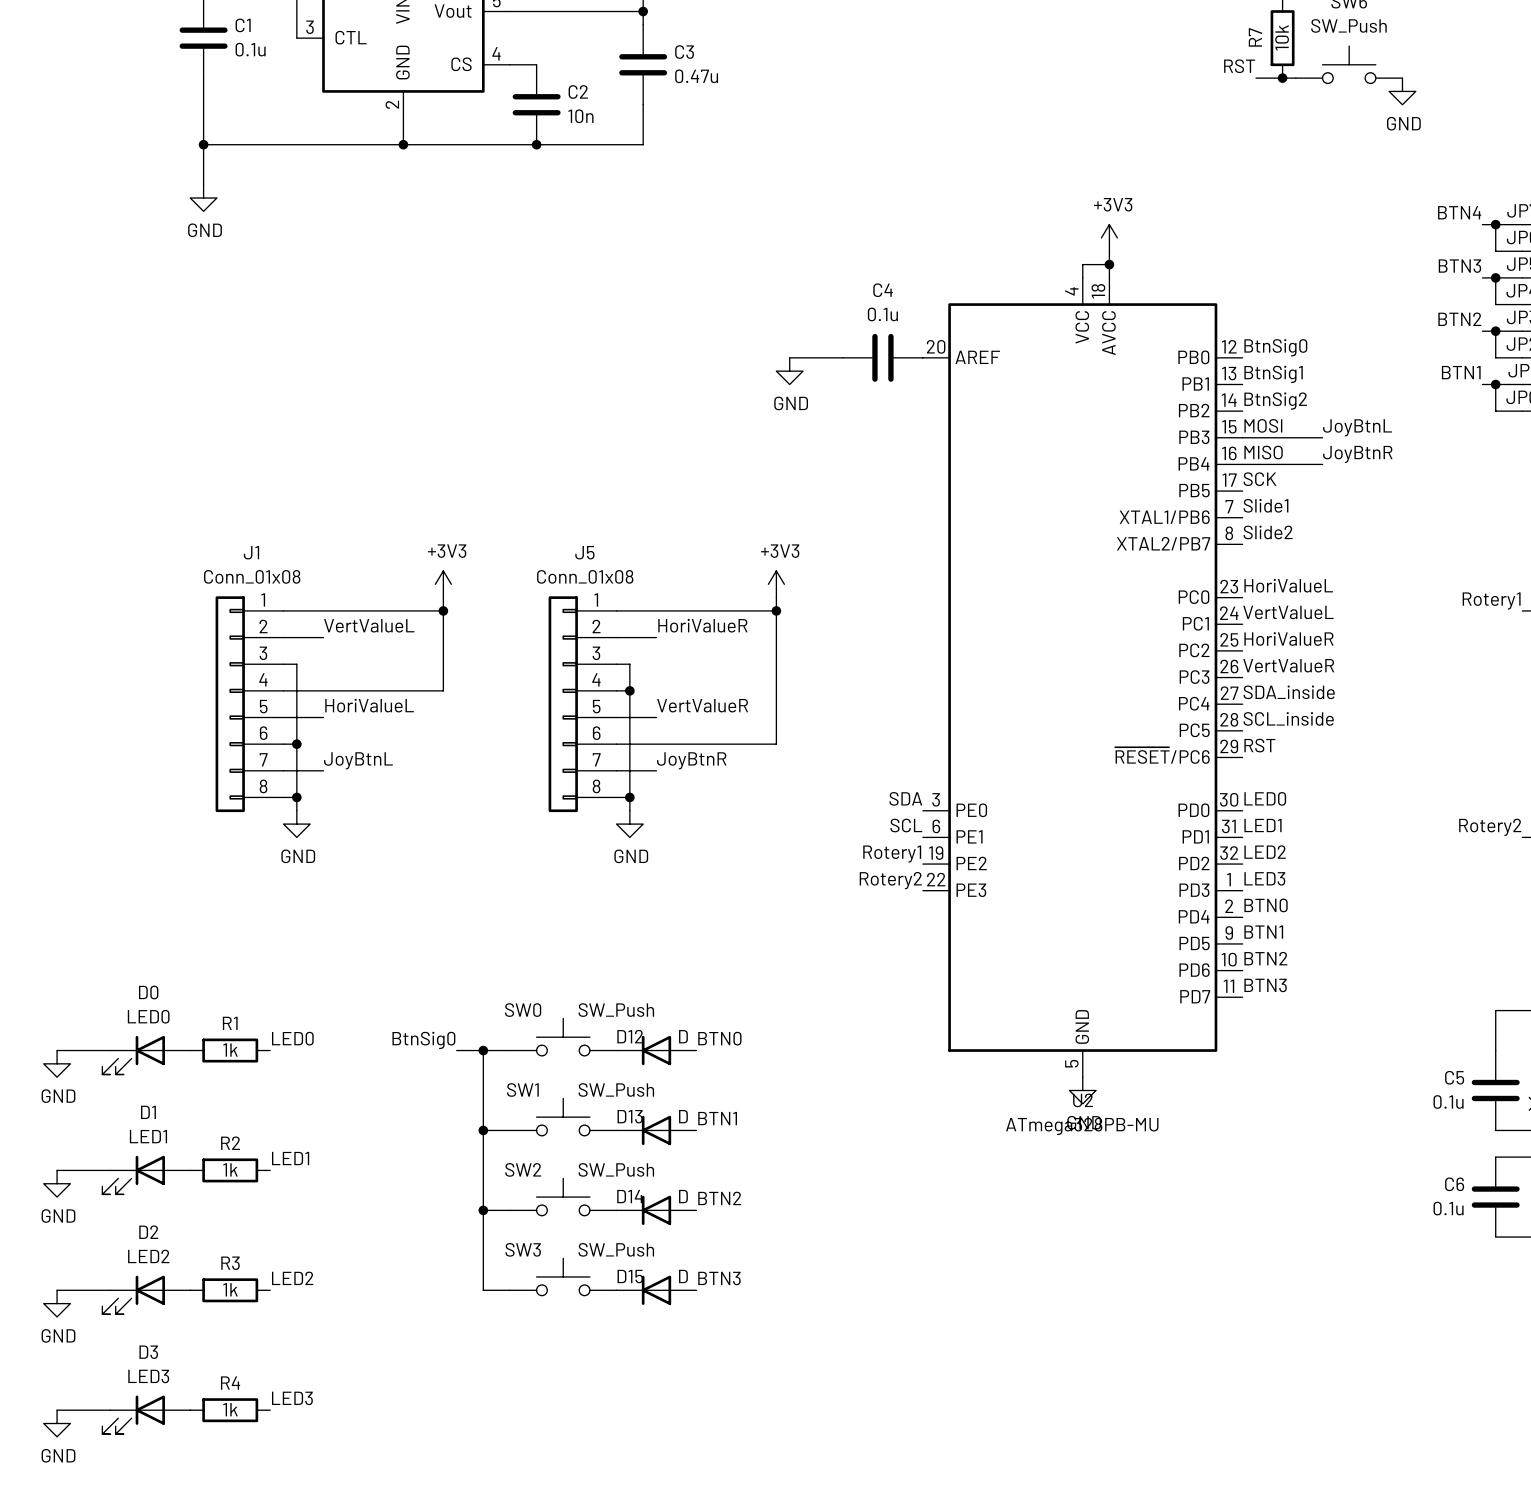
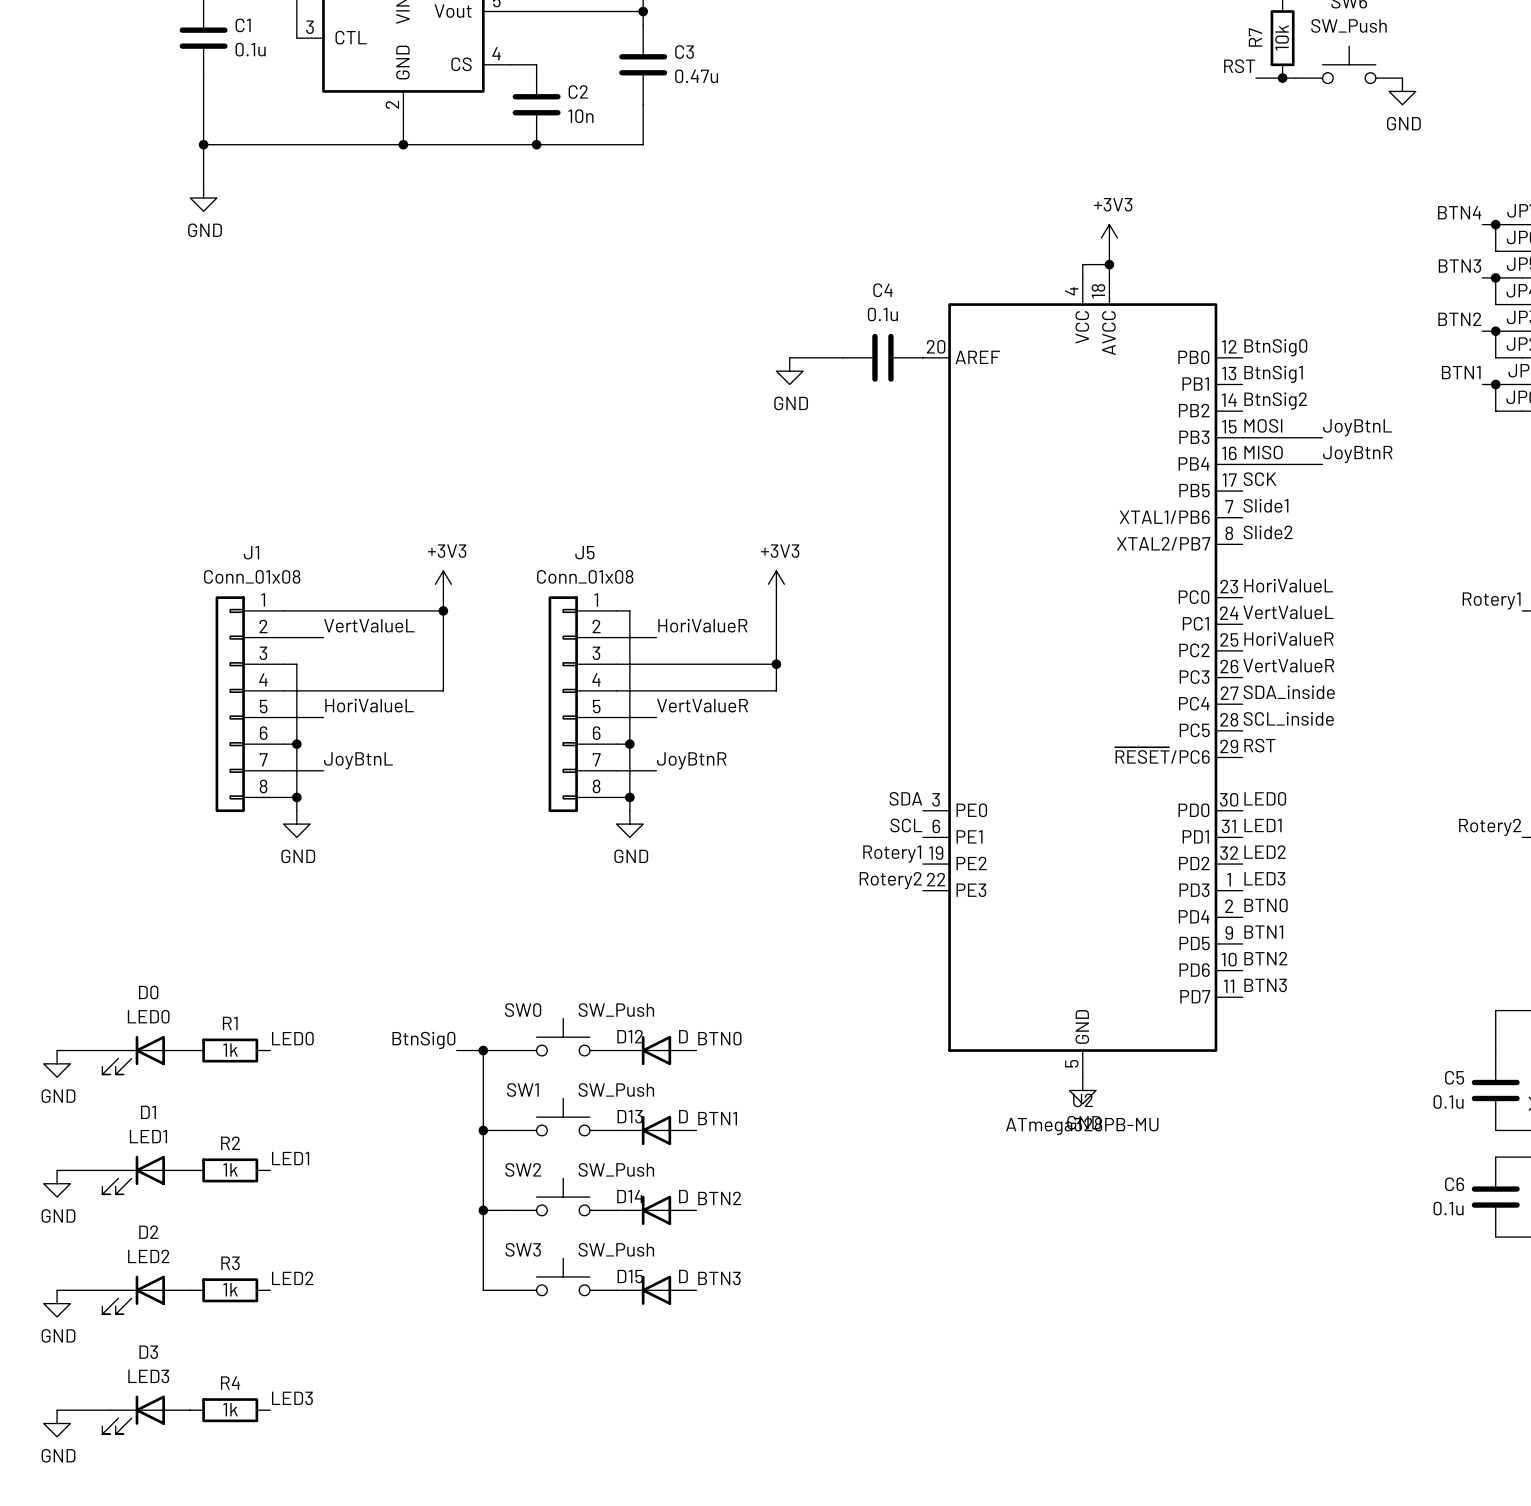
wire: (629, 610) (776, 610) -> (629, 610) (629, 664) (776, 664)
junction position: (776, 610) -> (776, 664)
junction position: (629, 690) -> (629, 744)
wire: (776, 690) (776, 744) (629, 744) -> (776, 690) (629, 690)

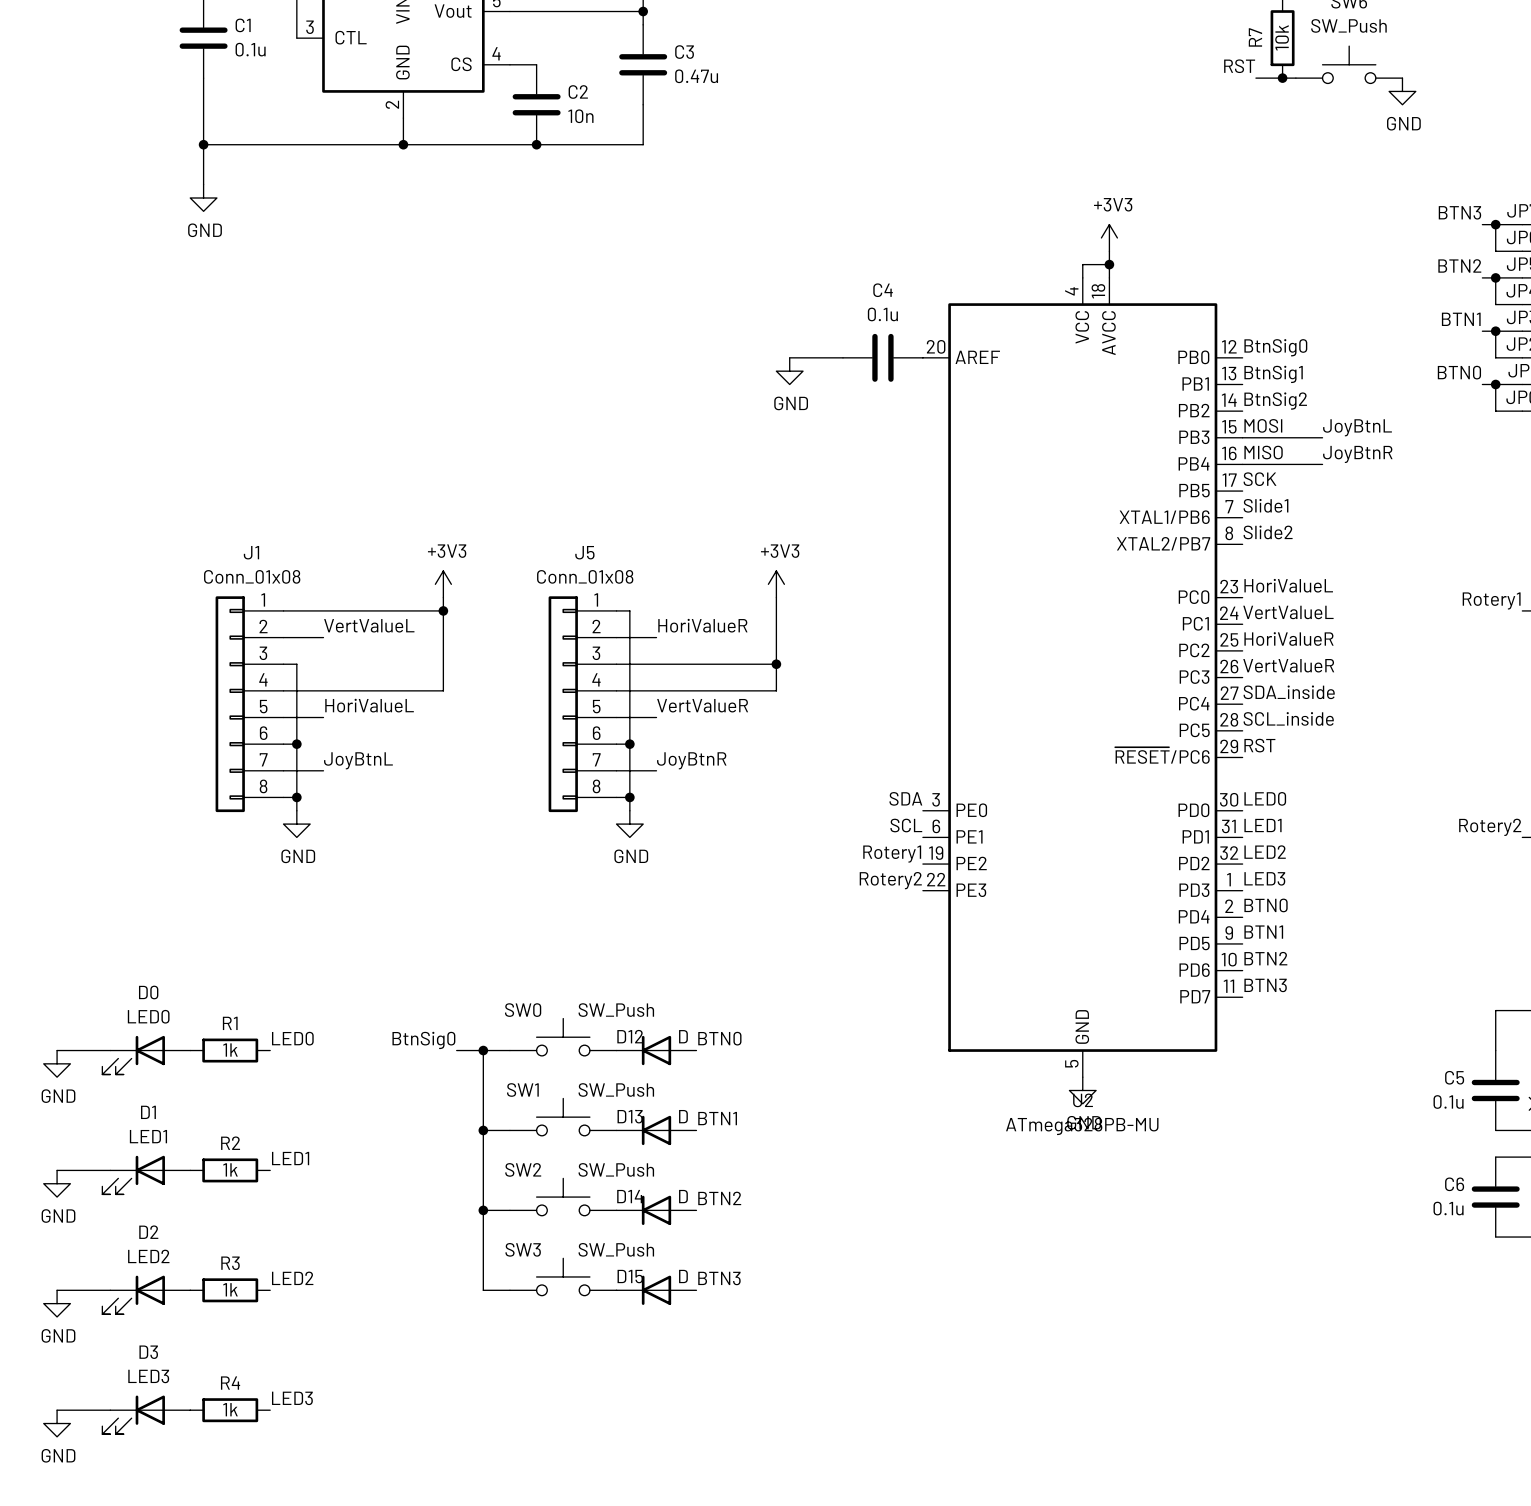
label: BTN4 (1459, 212) -> BTN3 (1459, 212)
label: BTN3 (1459, 266) -> BTN2 (1459, 265)
label: BTN2 (1459, 319) -> BTN1 (1461, 319)
label: BTN1 (1461, 372) -> BTN0 (1459, 372)

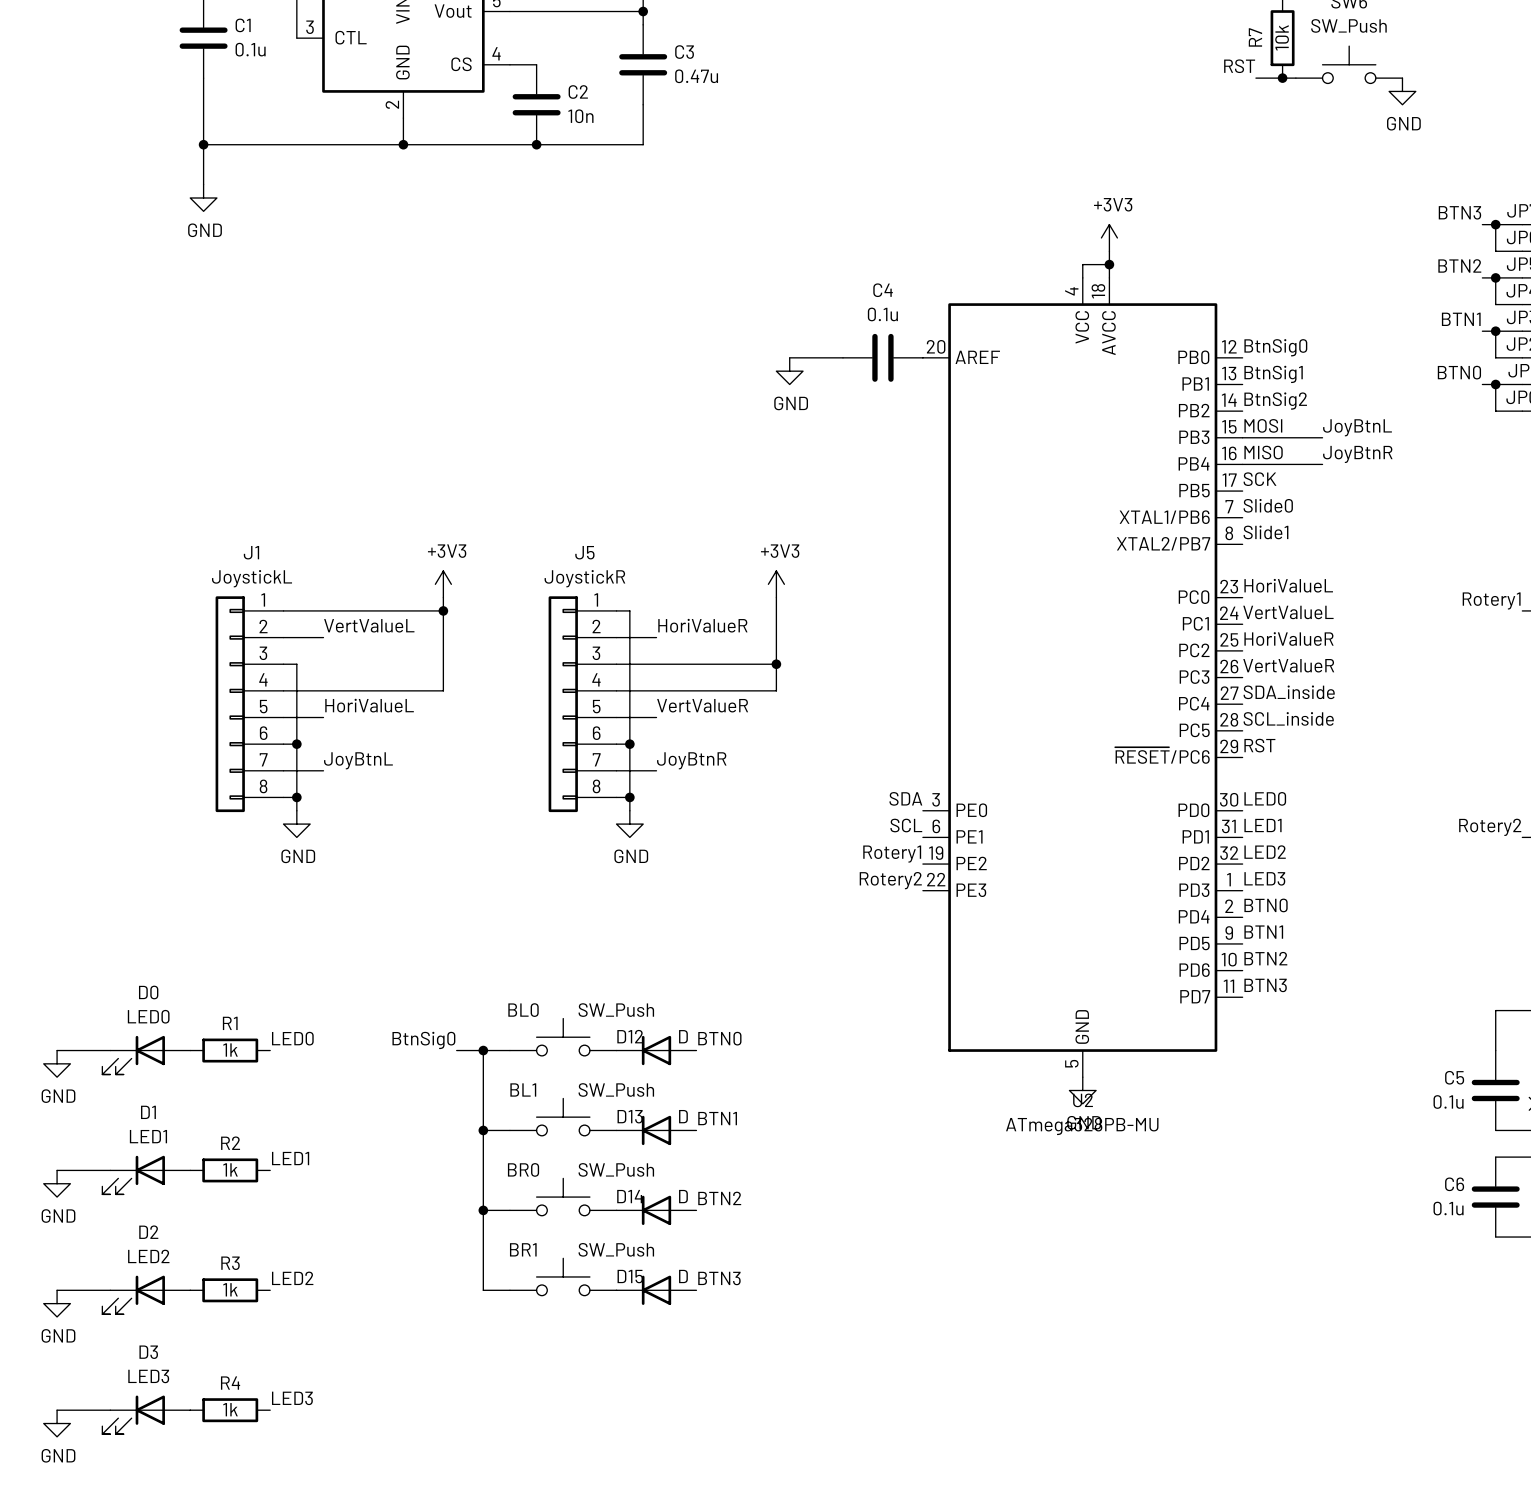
label: Slide1 (1265, 505) -> Slide0 (1268, 505)
label: Slide2 (1268, 532) -> Slide1 (1265, 532)
J1 value: Conn_01x08 (252, 576) -> JoystickL (252, 578)
J5 value: Conn_01x08 (585, 576) -> JoystickR (584, 578)
SW0 name: SW0 (523, 1010) -> BL0 (523, 1010)
SW1 name: SW1 (522, 1090) -> BL1 (523, 1090)
SW2 name: SW2 (523, 1169) -> BR0 (523, 1169)
SW3 name: SW3 (523, 1249) -> BR1 (523, 1249)

